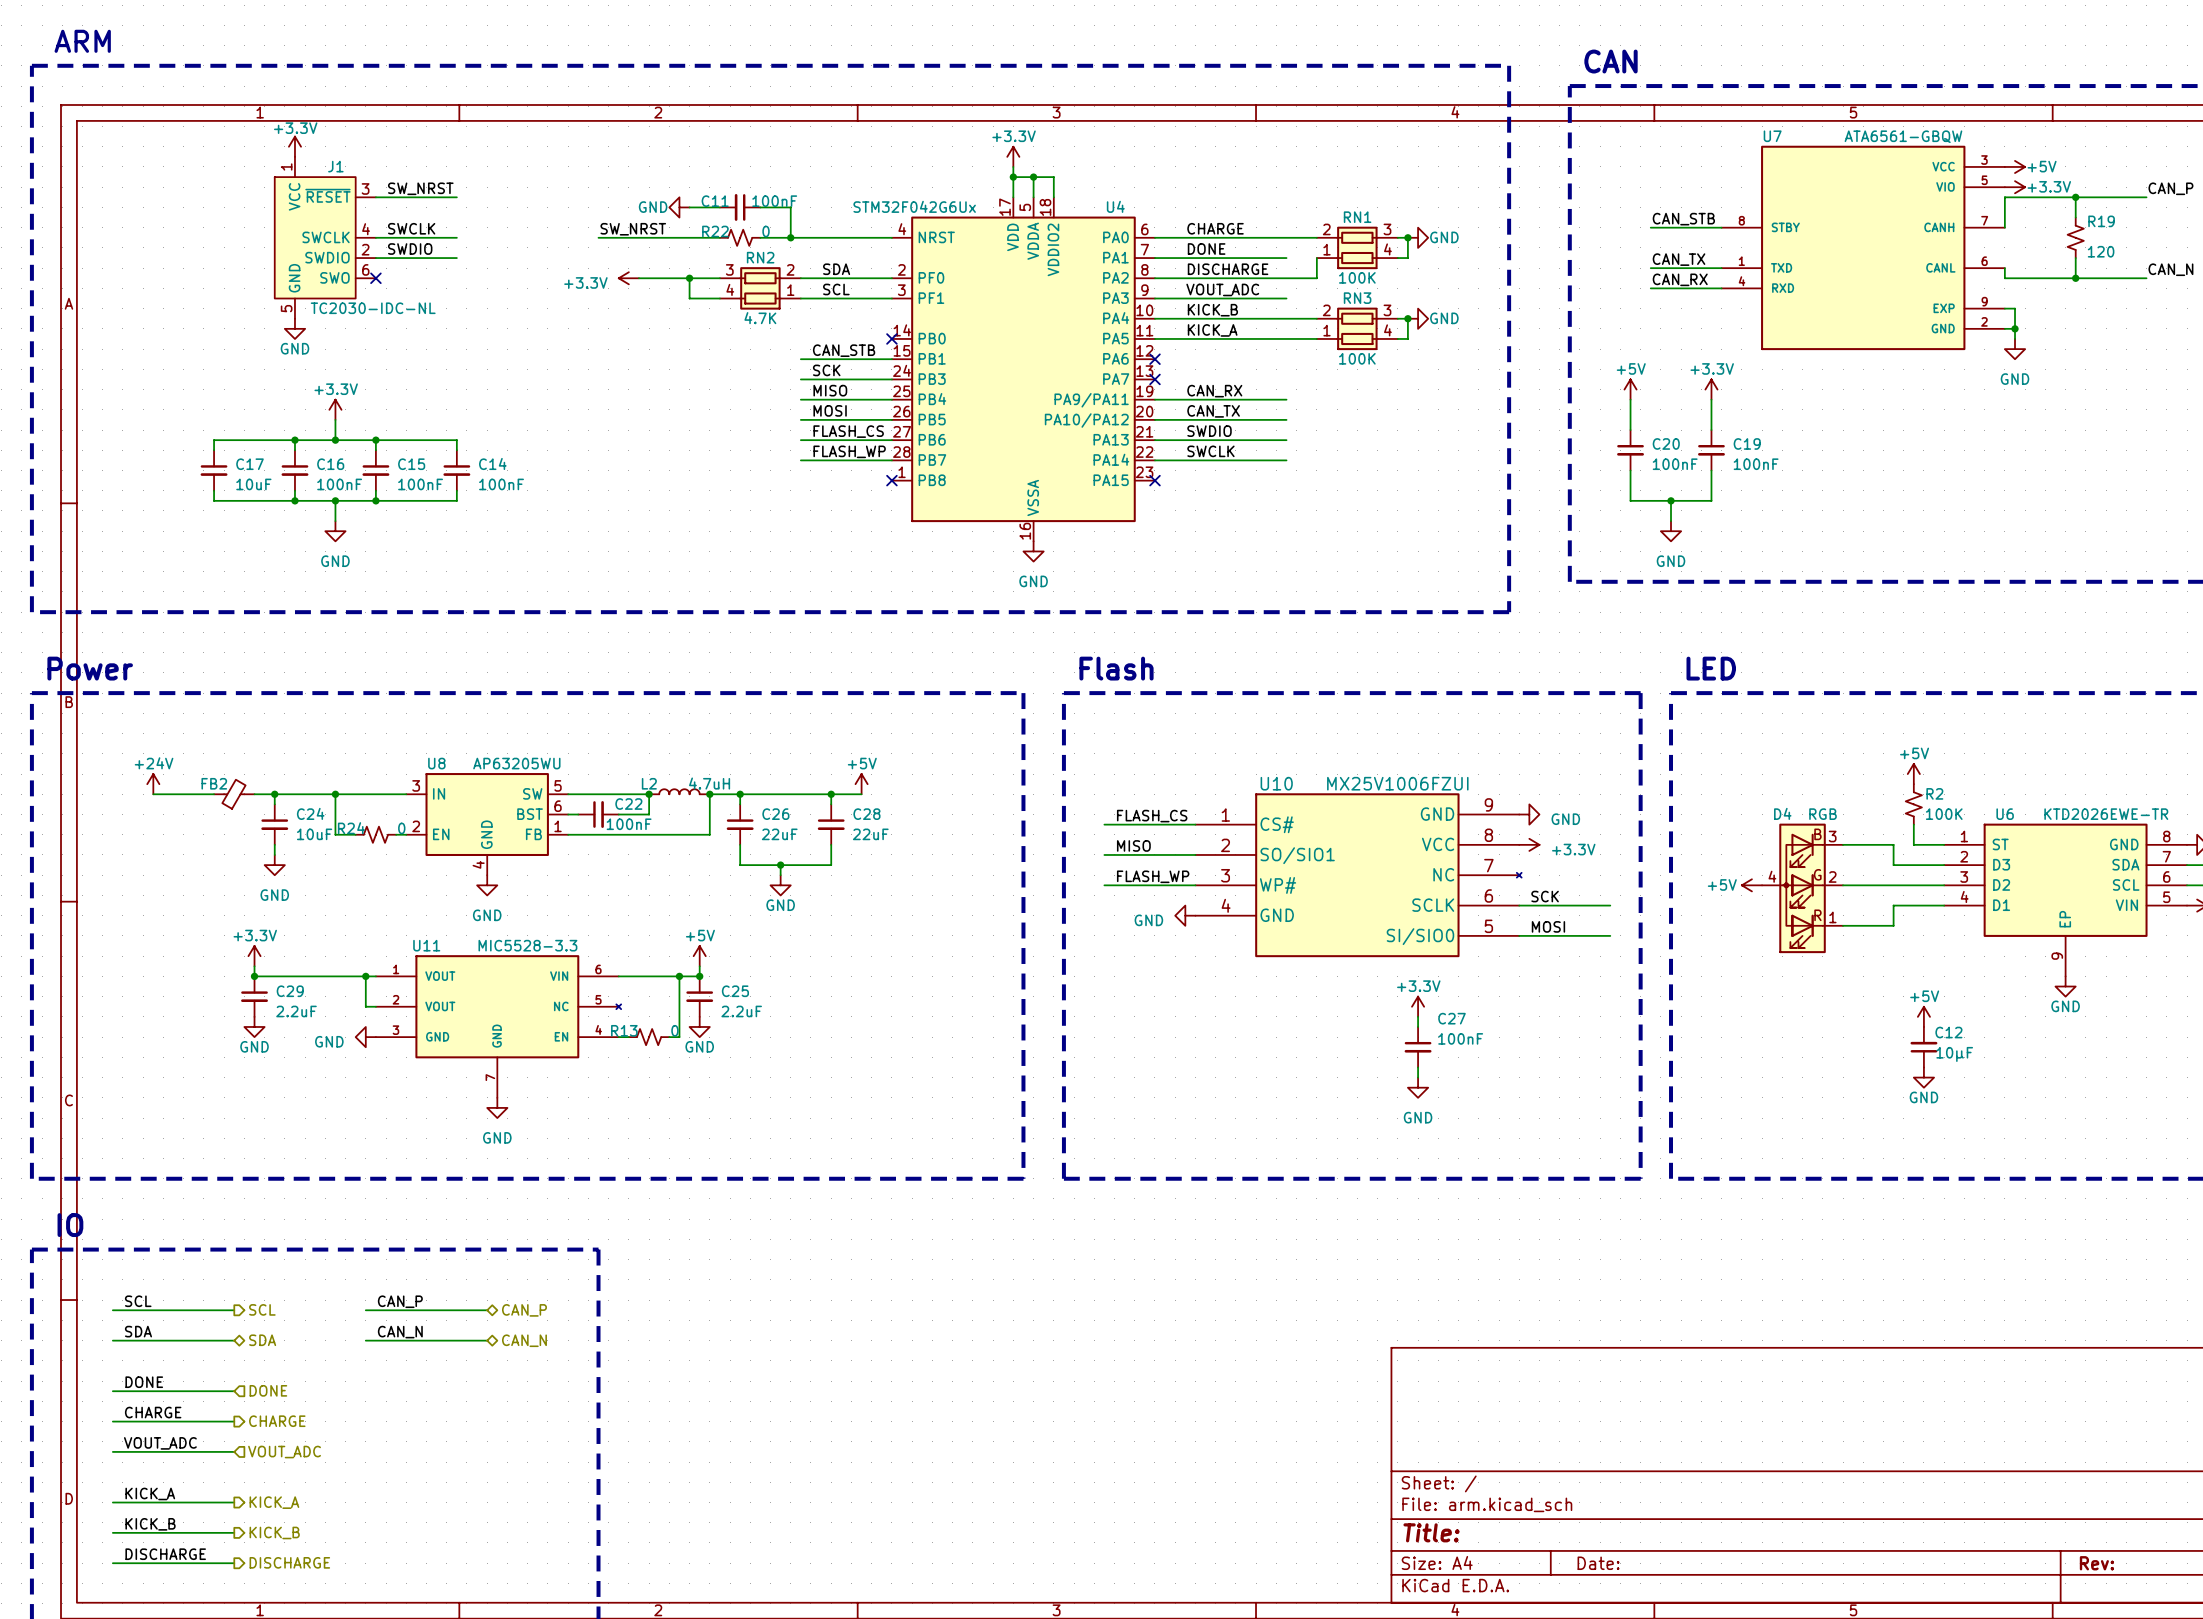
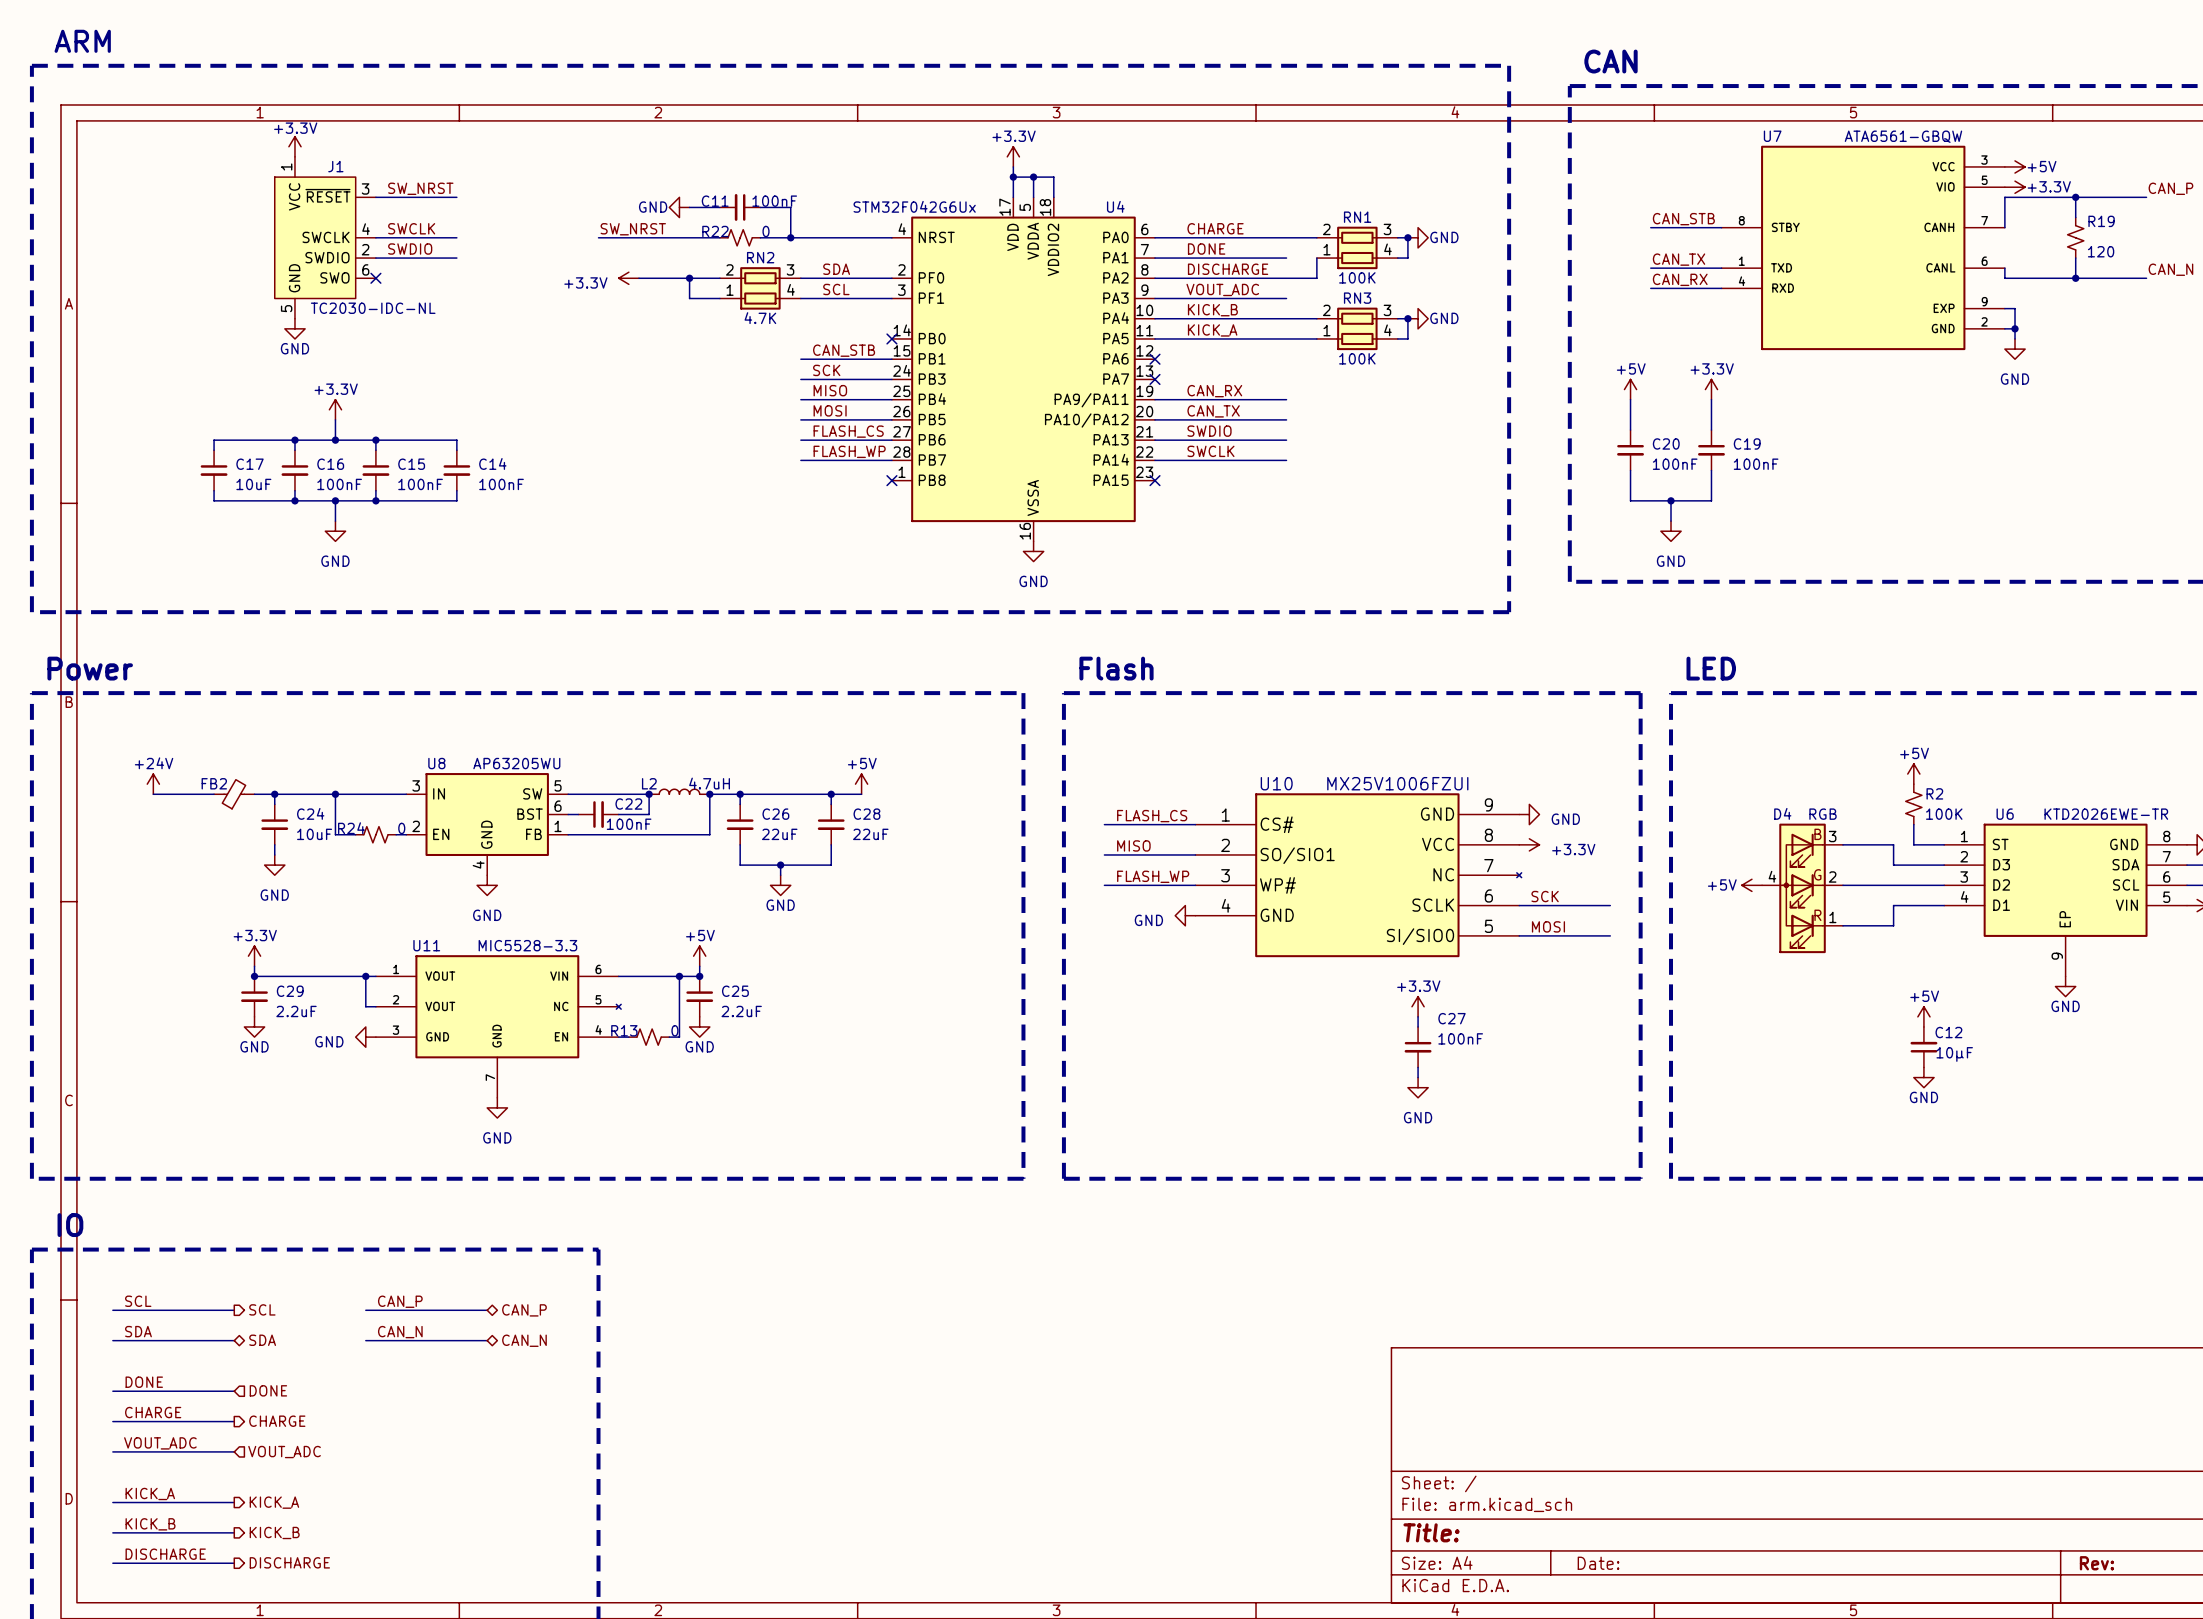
RN2 flip: as is (760, 288) -> left-right (760, 288)

